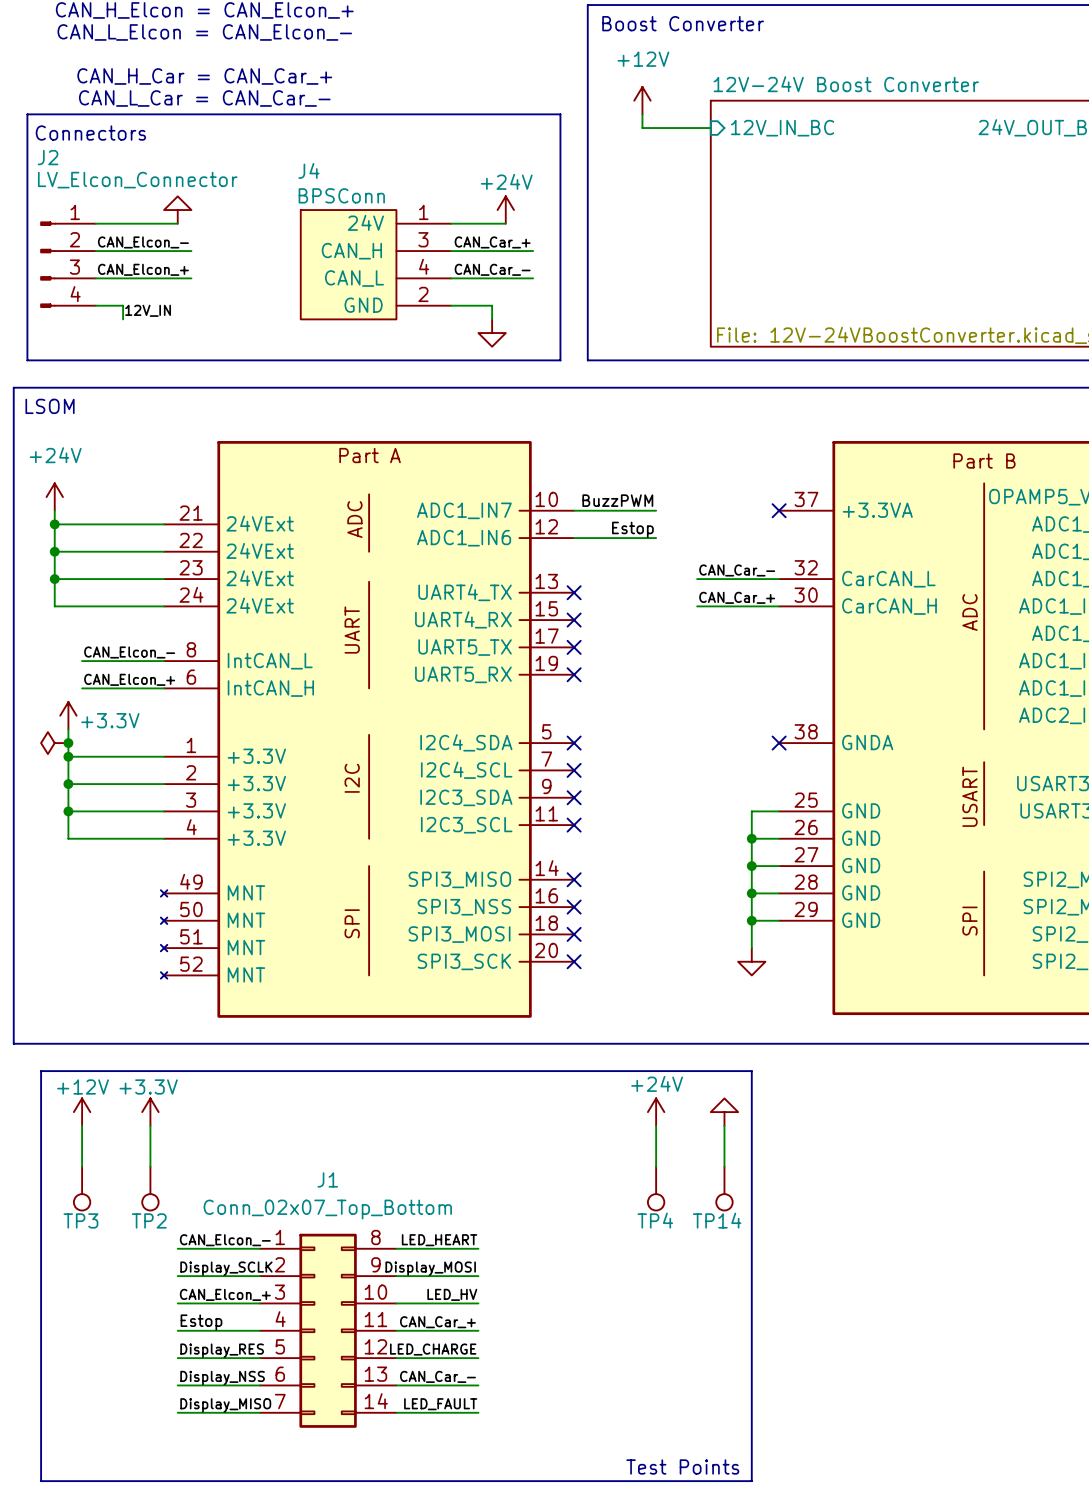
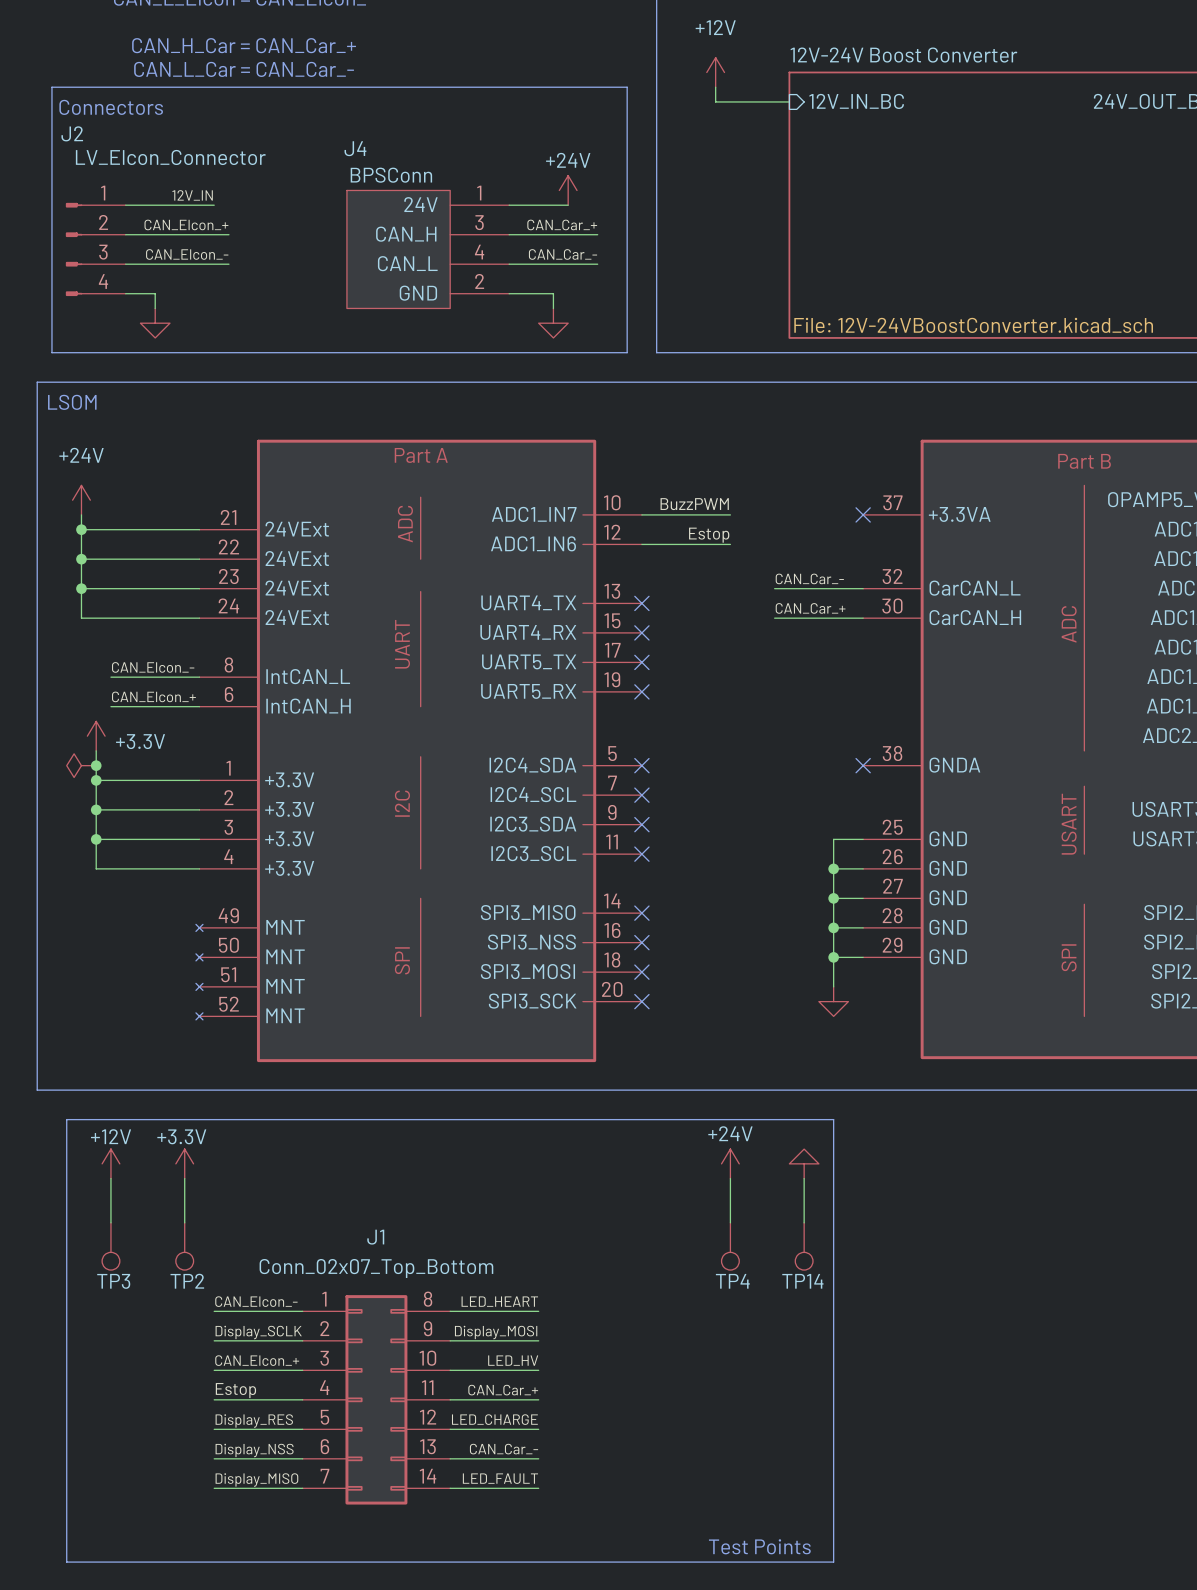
power symbol rotation: 0° (177, 210) -> 180° (155, 323)
power symbol position: (177, 210) -> (155, 323)
label: CAN_Elcon_- (143, 242) -> CAN_Elcon_+ (186, 224)
label: CAN_Elcon_+ (143, 269) -> CAN_Elcon_- (187, 254)
label position: 12V_IN (148, 310) -> 12V_IN (192, 195)

